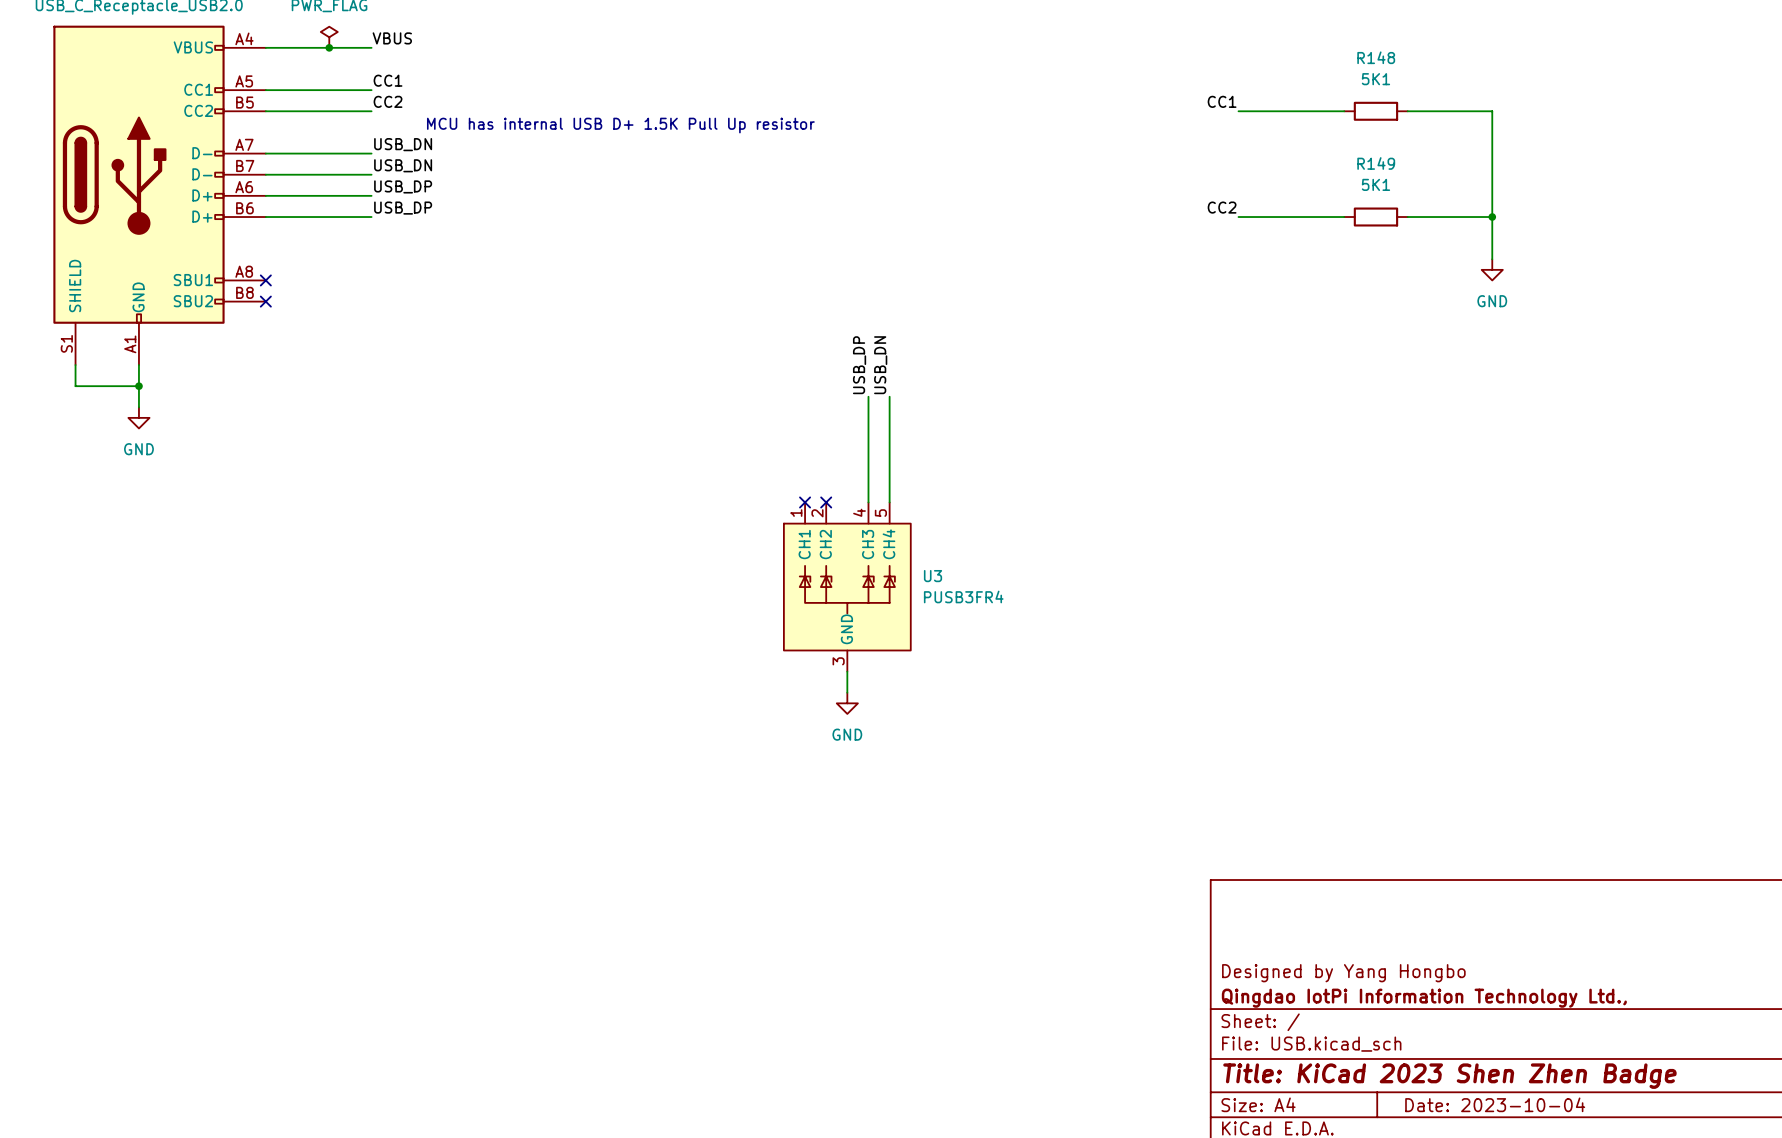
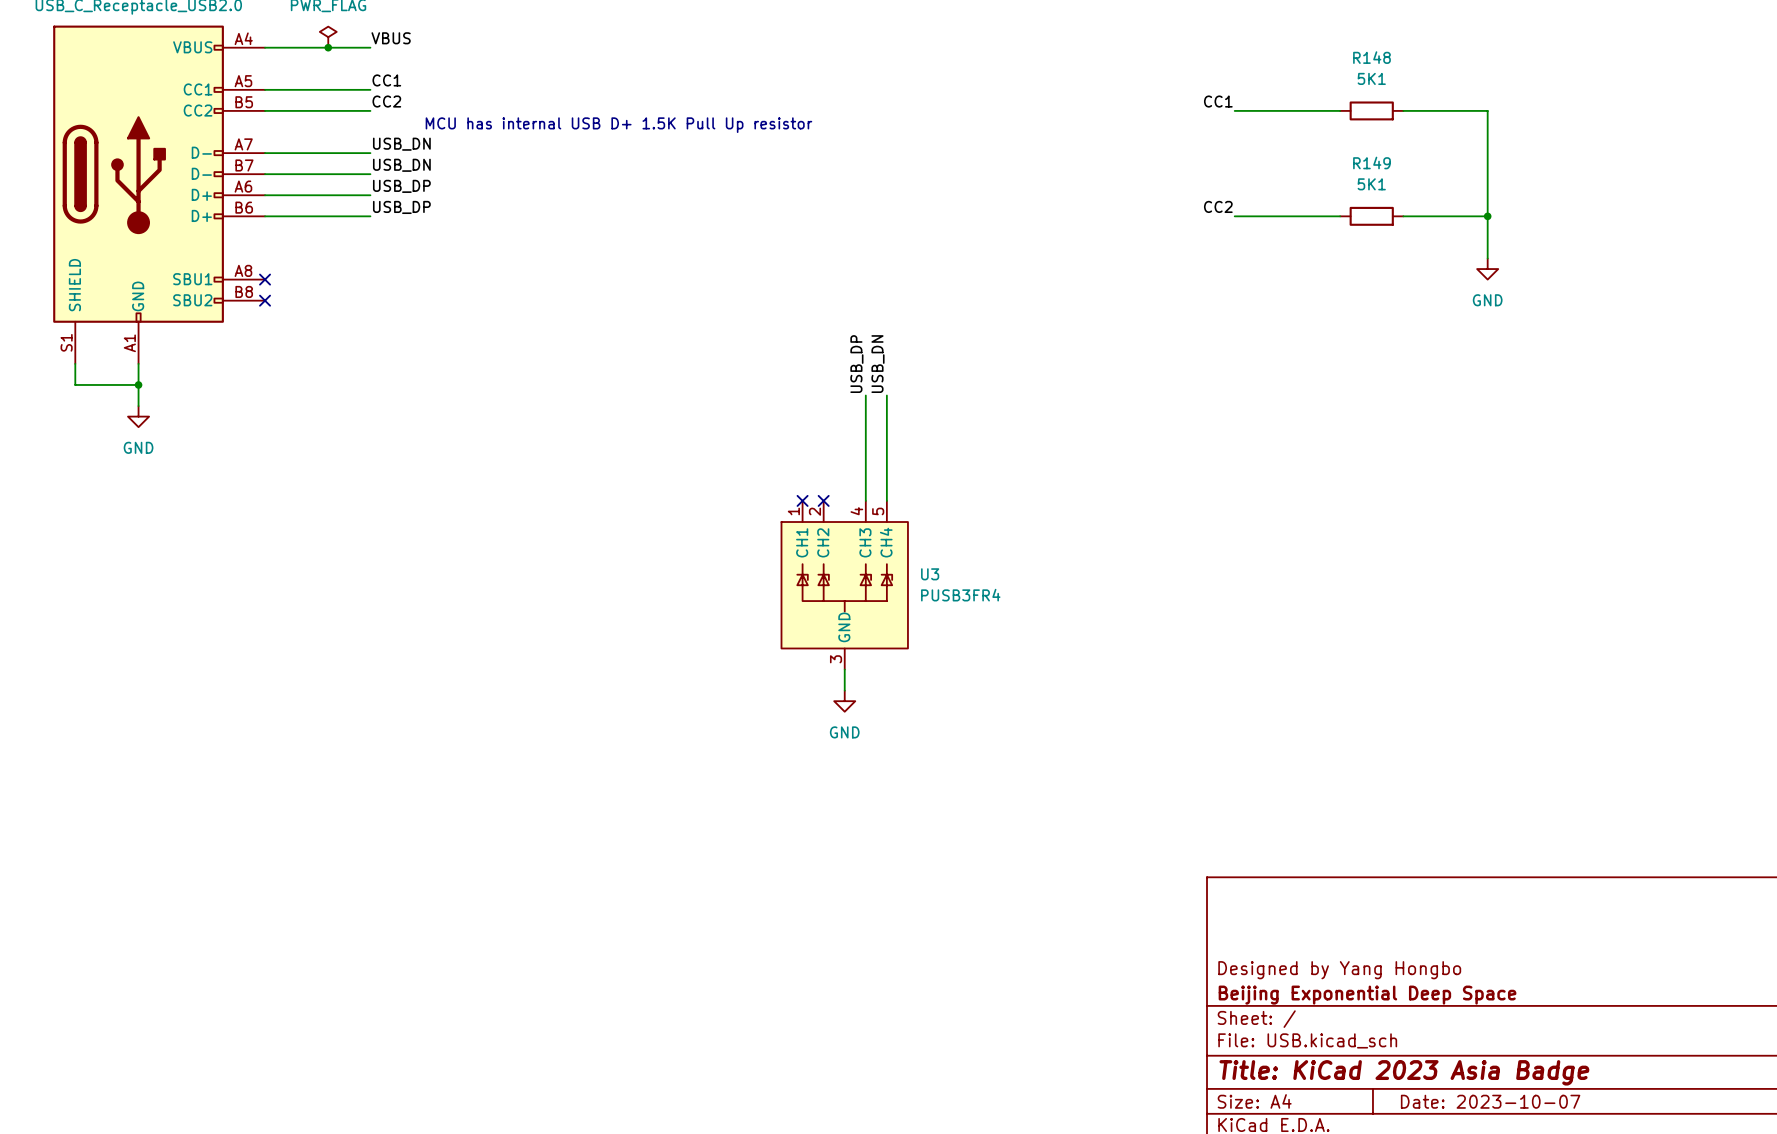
title block: Qingdao IotPi Information Technology Ltd., (1424, 998) -> Beijing Exponential Deep Space (1367, 995)
title block: Title: KiCad 2023 Shen Zhen Badge (1449, 1076) -> Title: KiCad 2023 Asia Badge (1404, 1072)
title block: Date: 2023-10-04 (1495, 1104) -> Date: 2023-10-07 (1490, 1101)

